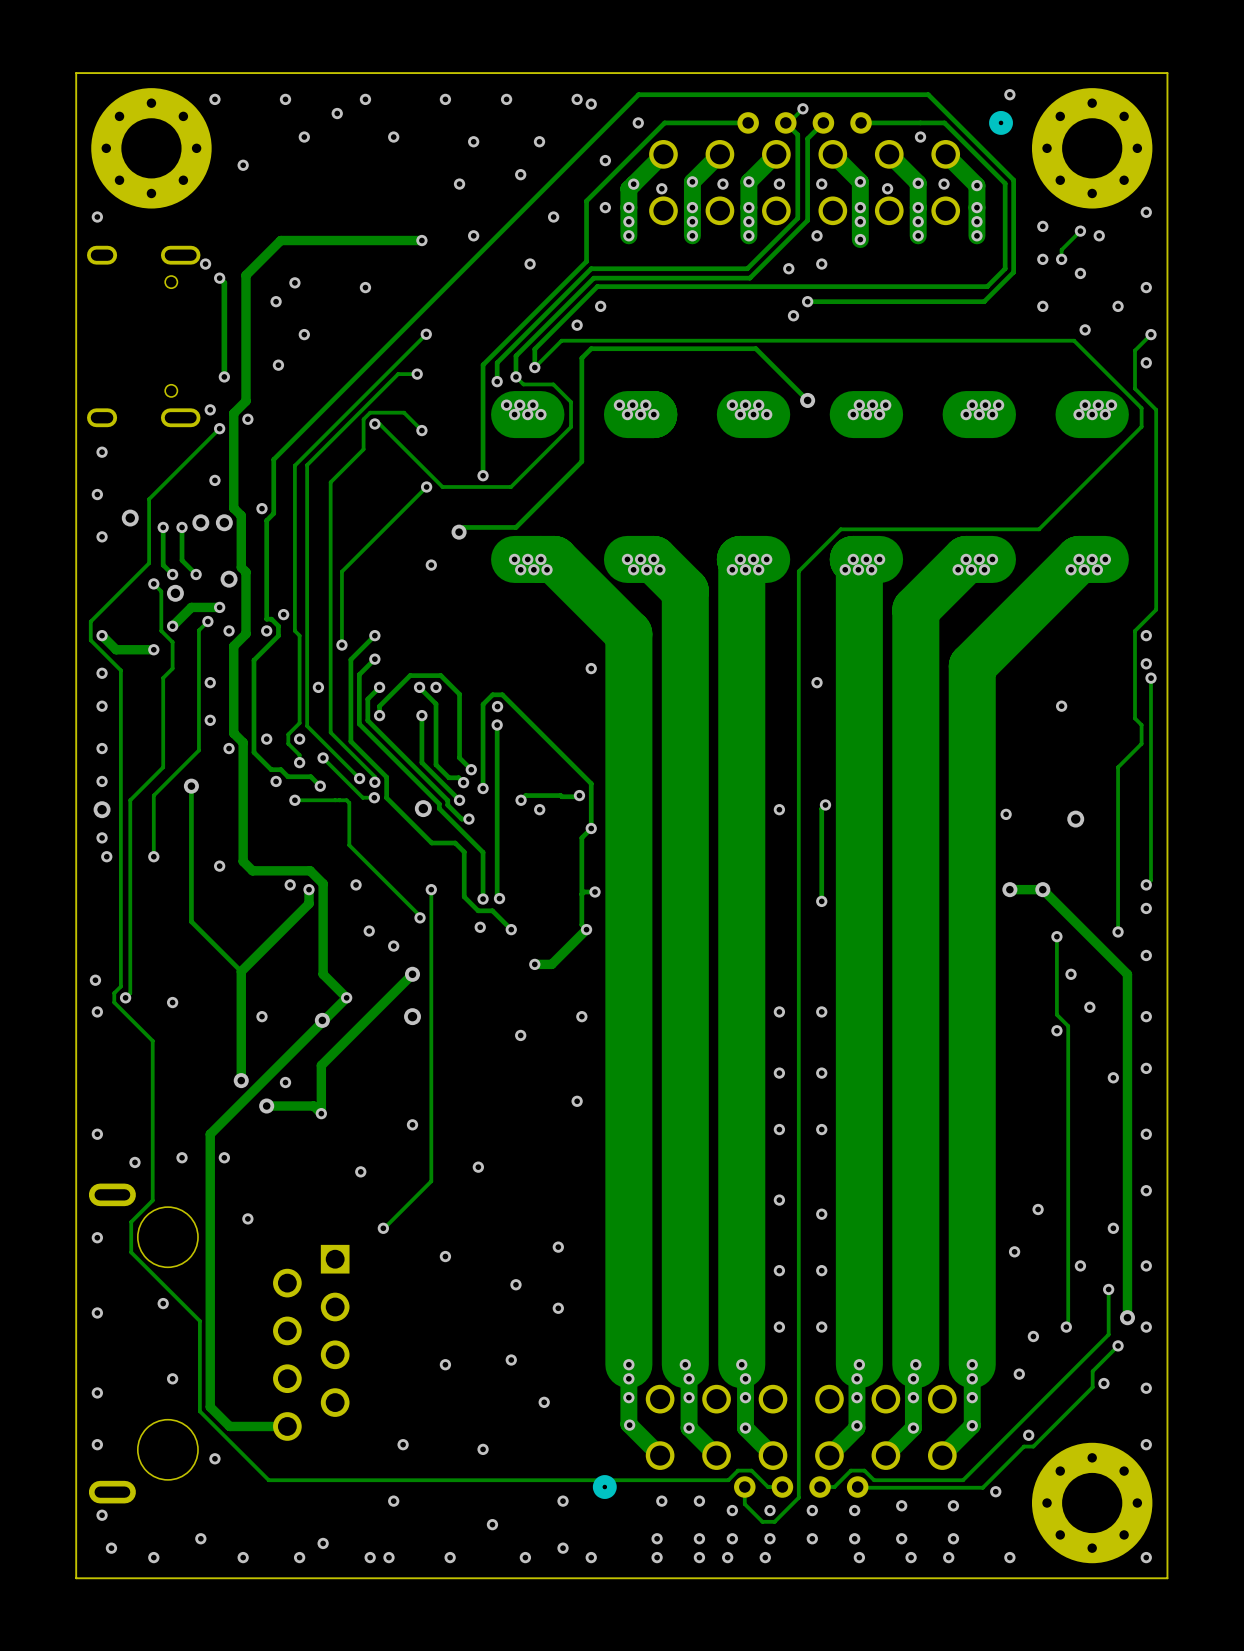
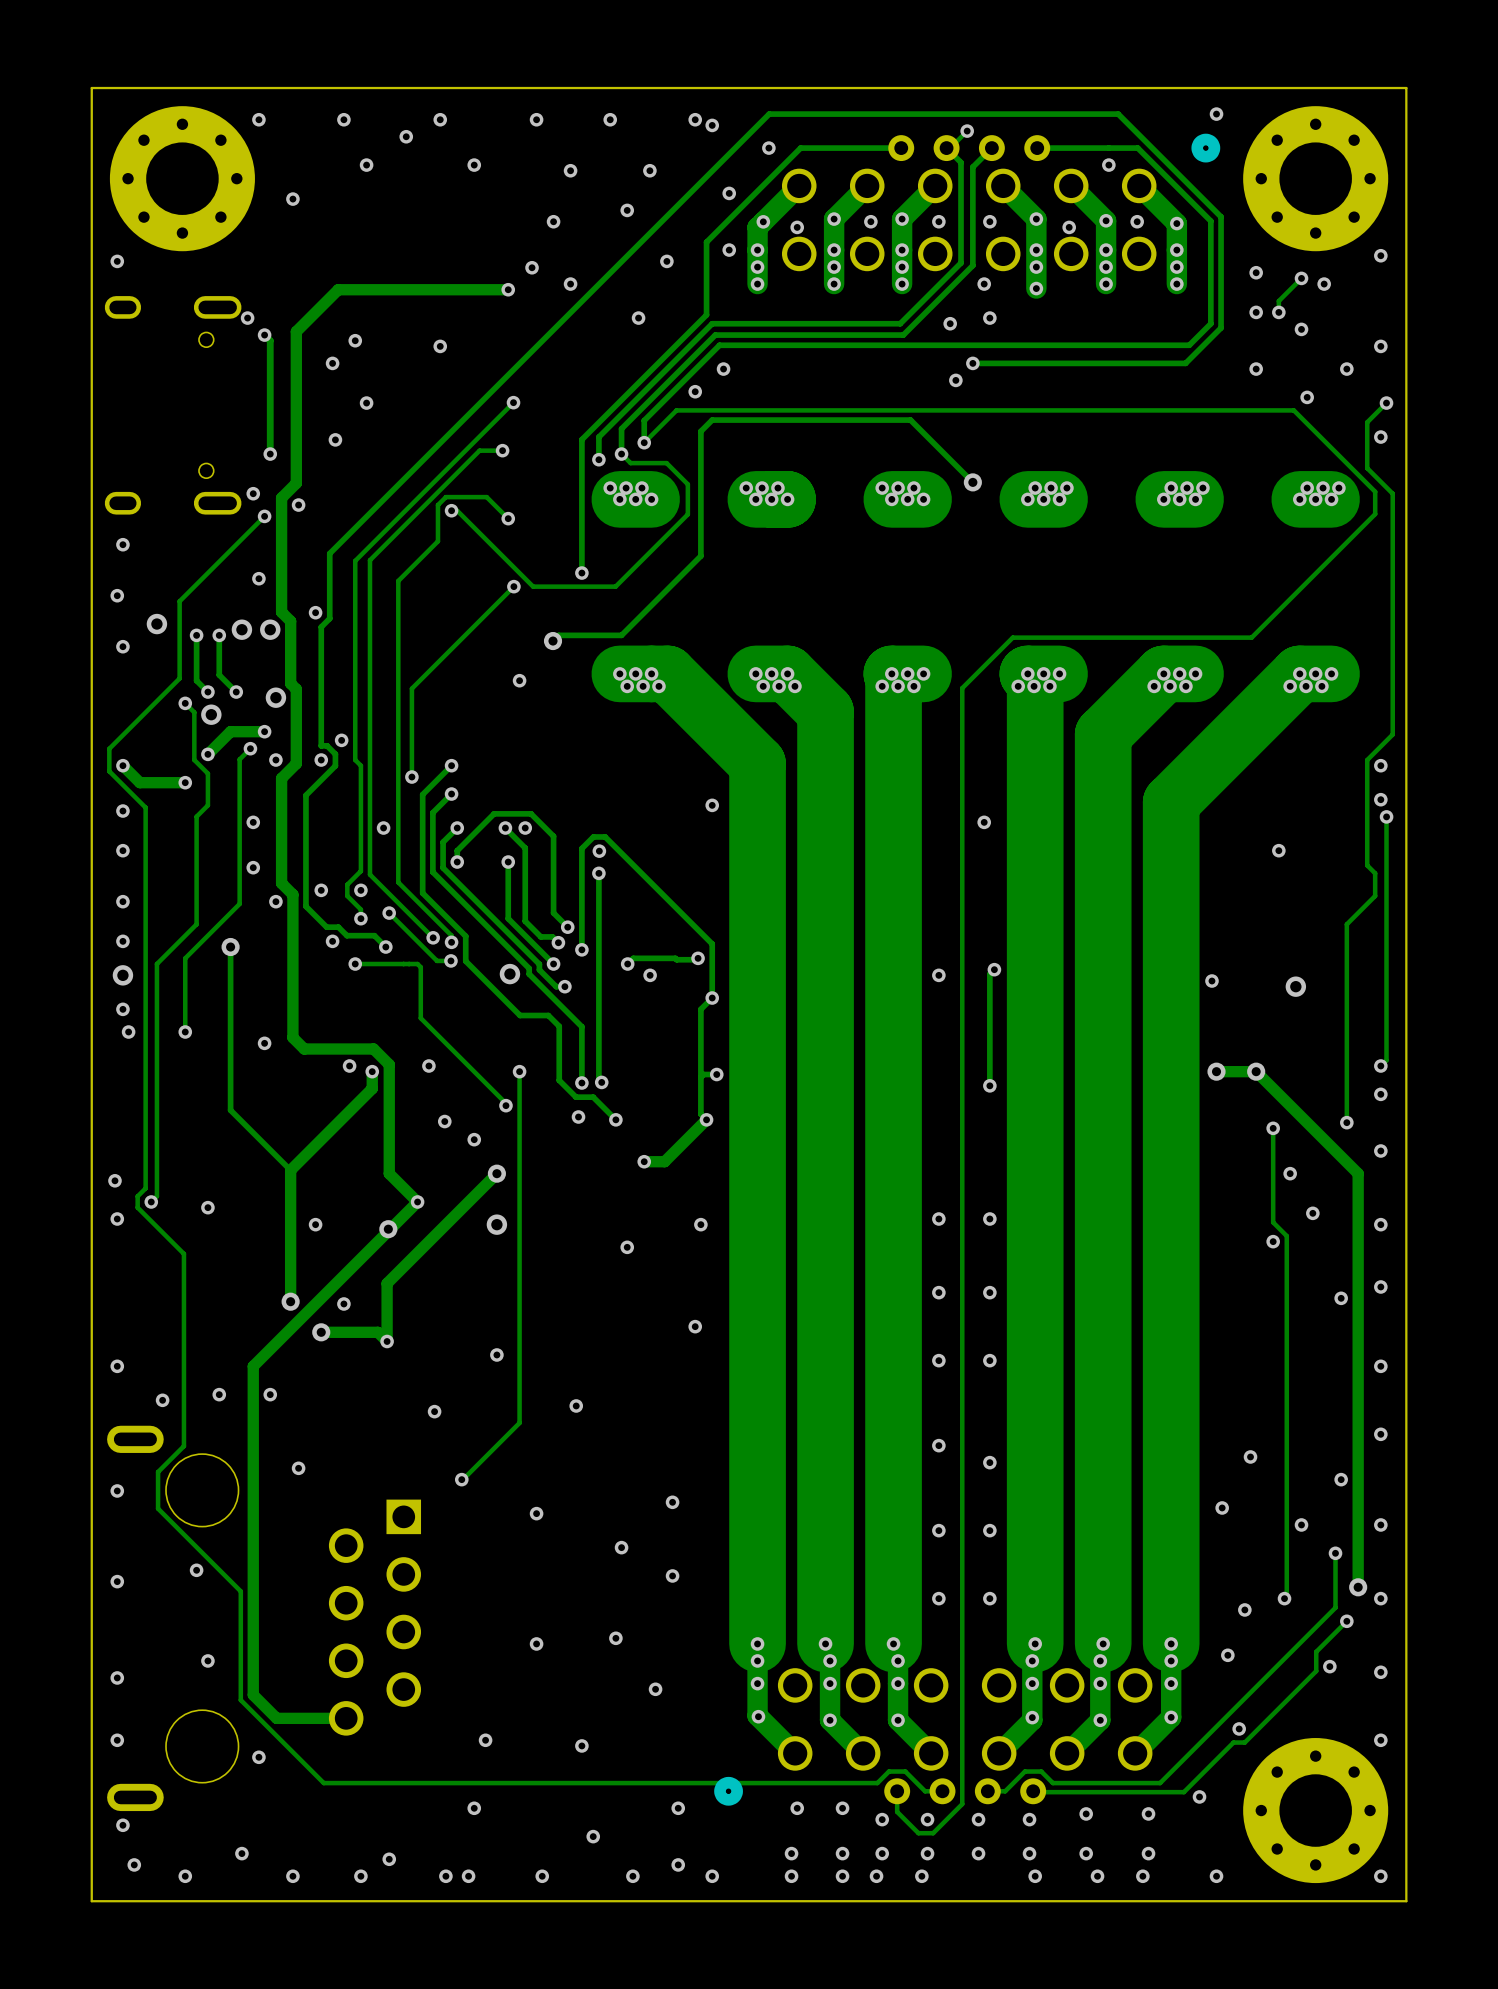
via: none -> (532, 267)

